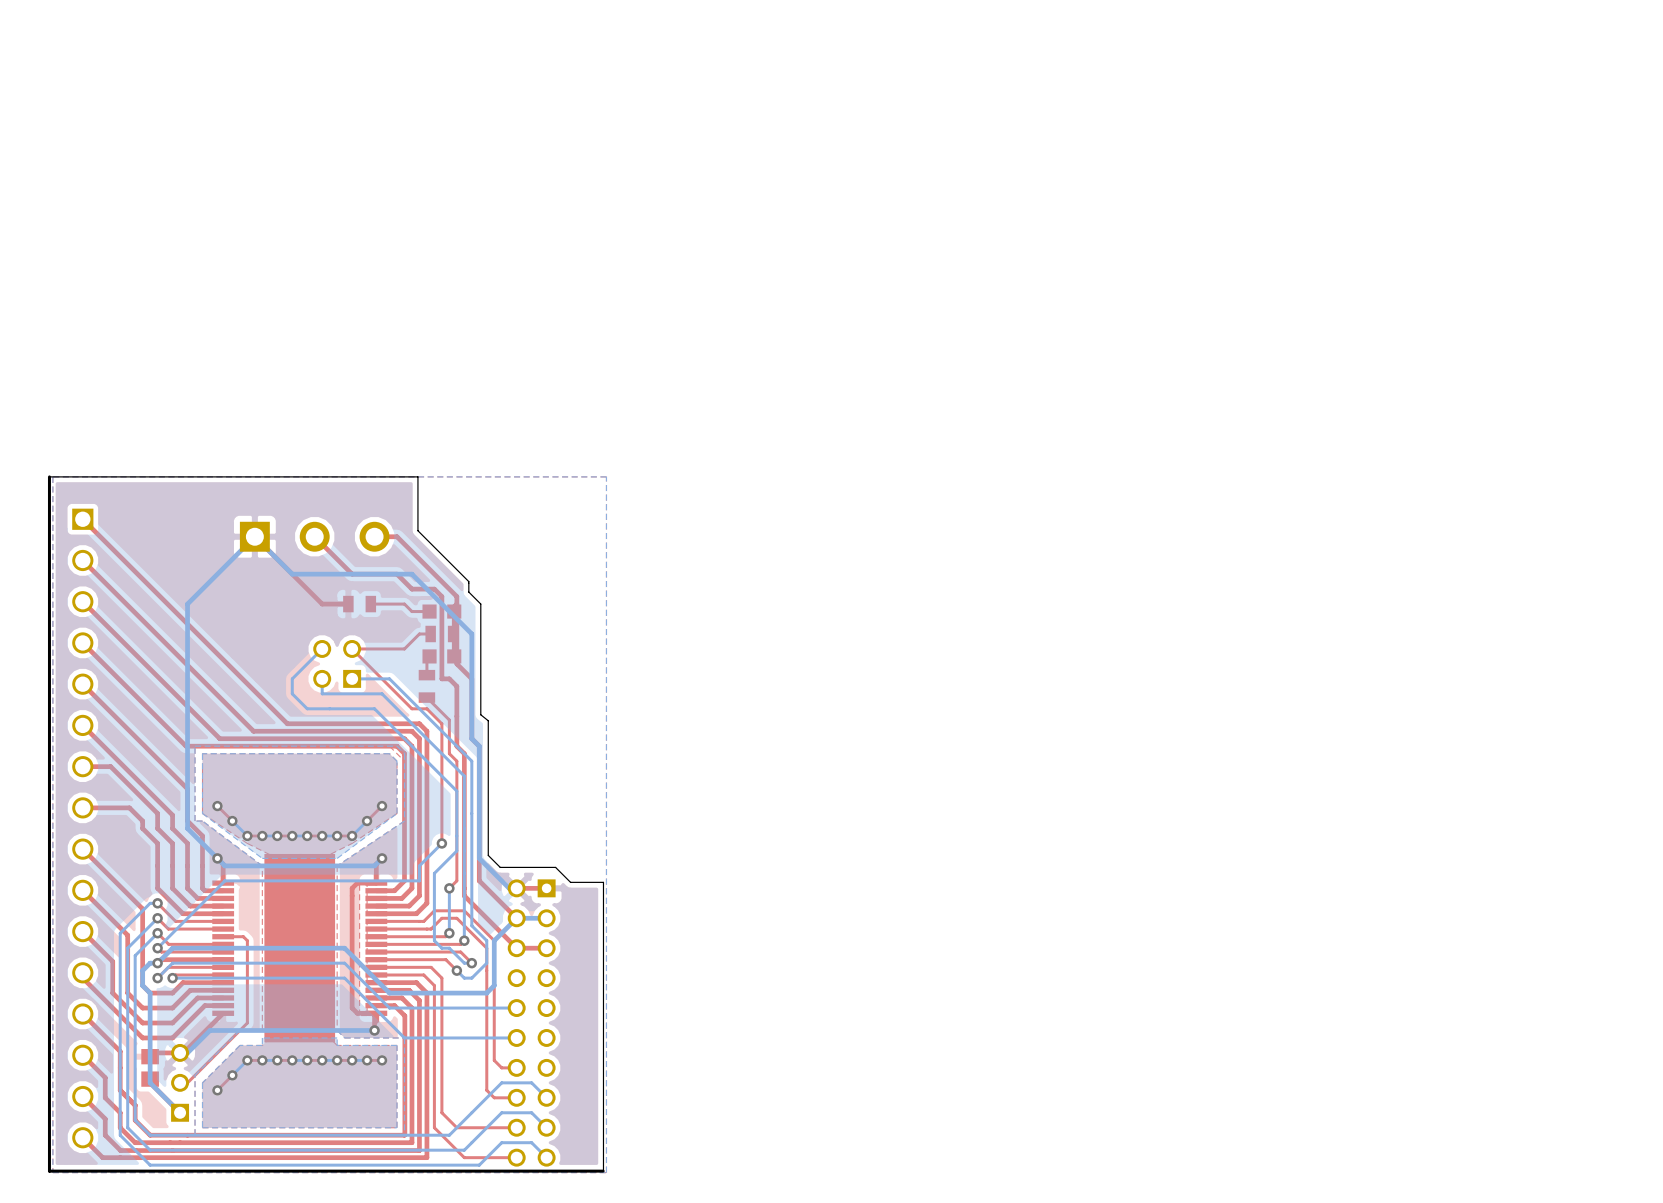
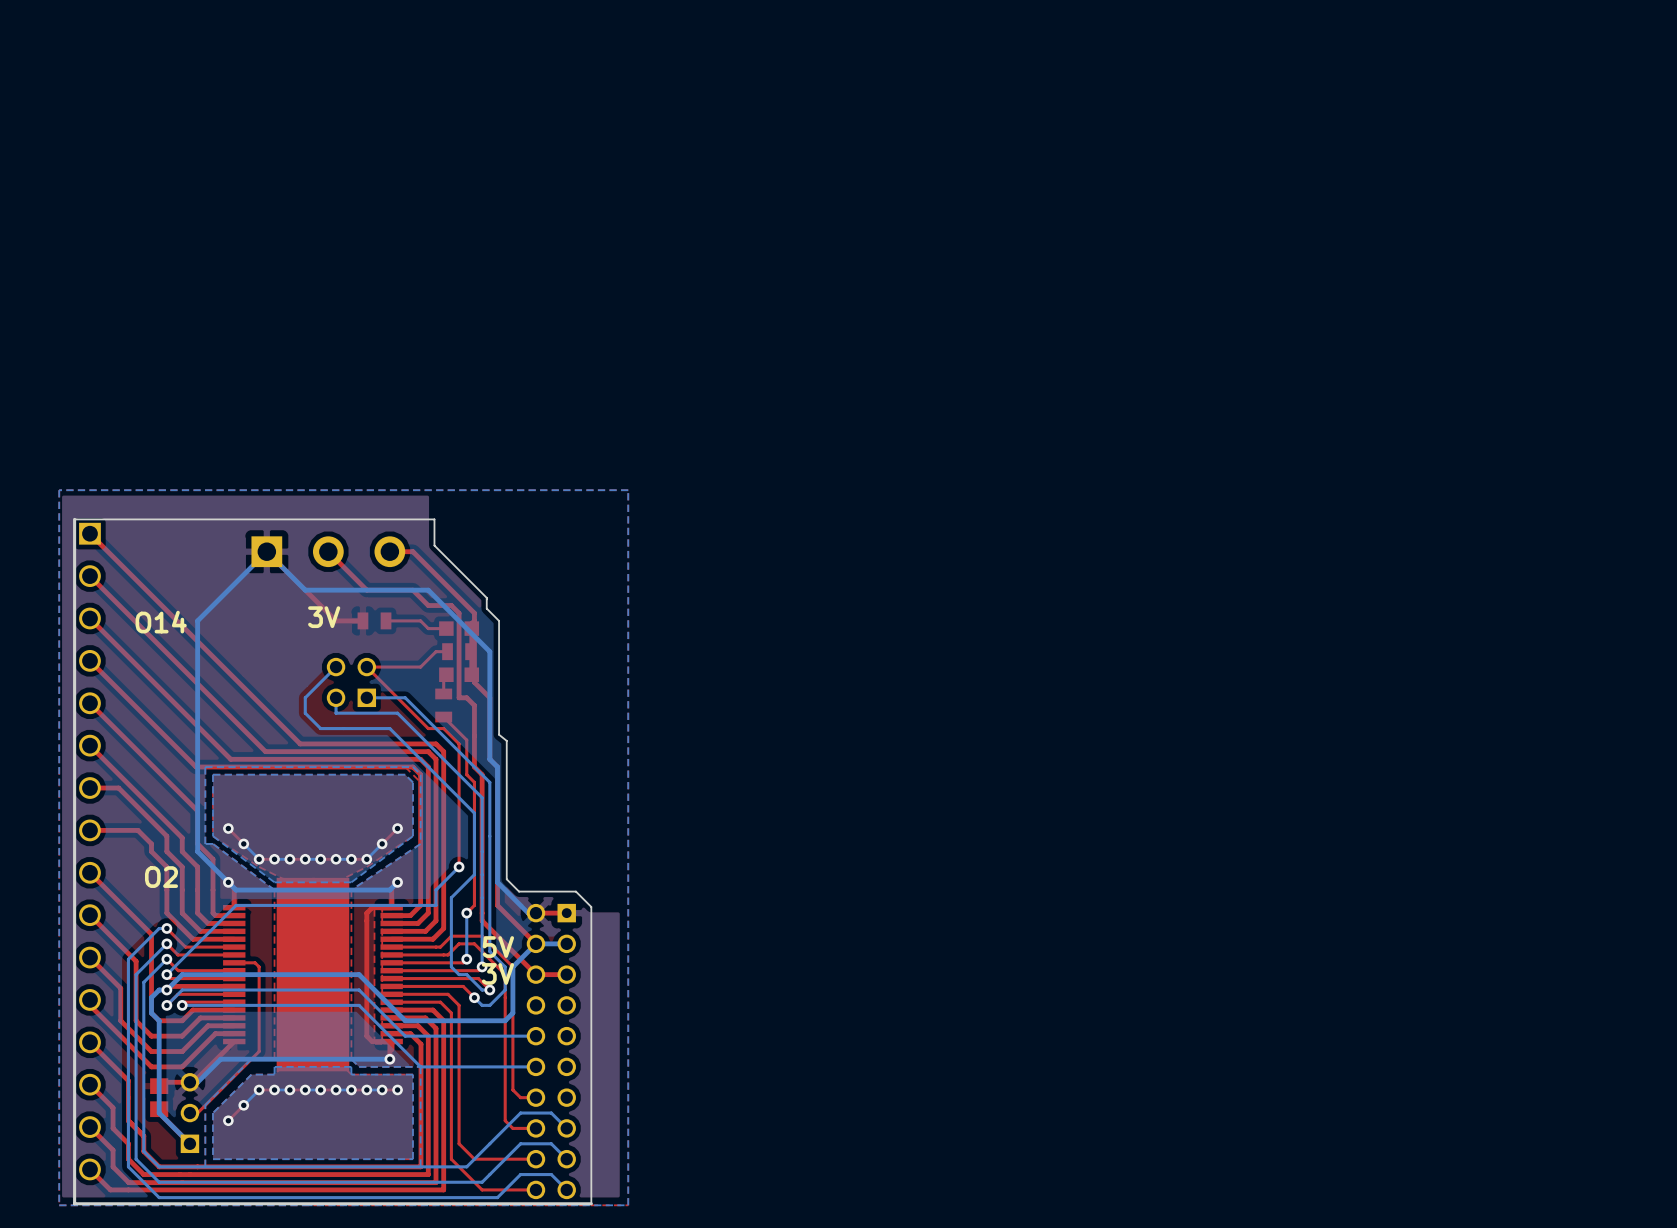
board edge: (49, 476) (49, 1171) (67, 1171) -> (434, 519) (74, 519) (74, 1203)
board edge: (49, 476) (417, 476) (417, 505) -> none
text: none -> 3V (324, 617)
text: none -> O14 (161, 622)
text: none -> O2 (161, 877)
board edge: (570, 882) (603, 882) (603, 1171) -> (591, 906) (591, 1203)
text: none -> 5V (498, 947)
text: none -> 3V (497, 973)
board edge: (603, 1171) (570, 1171) -> none

